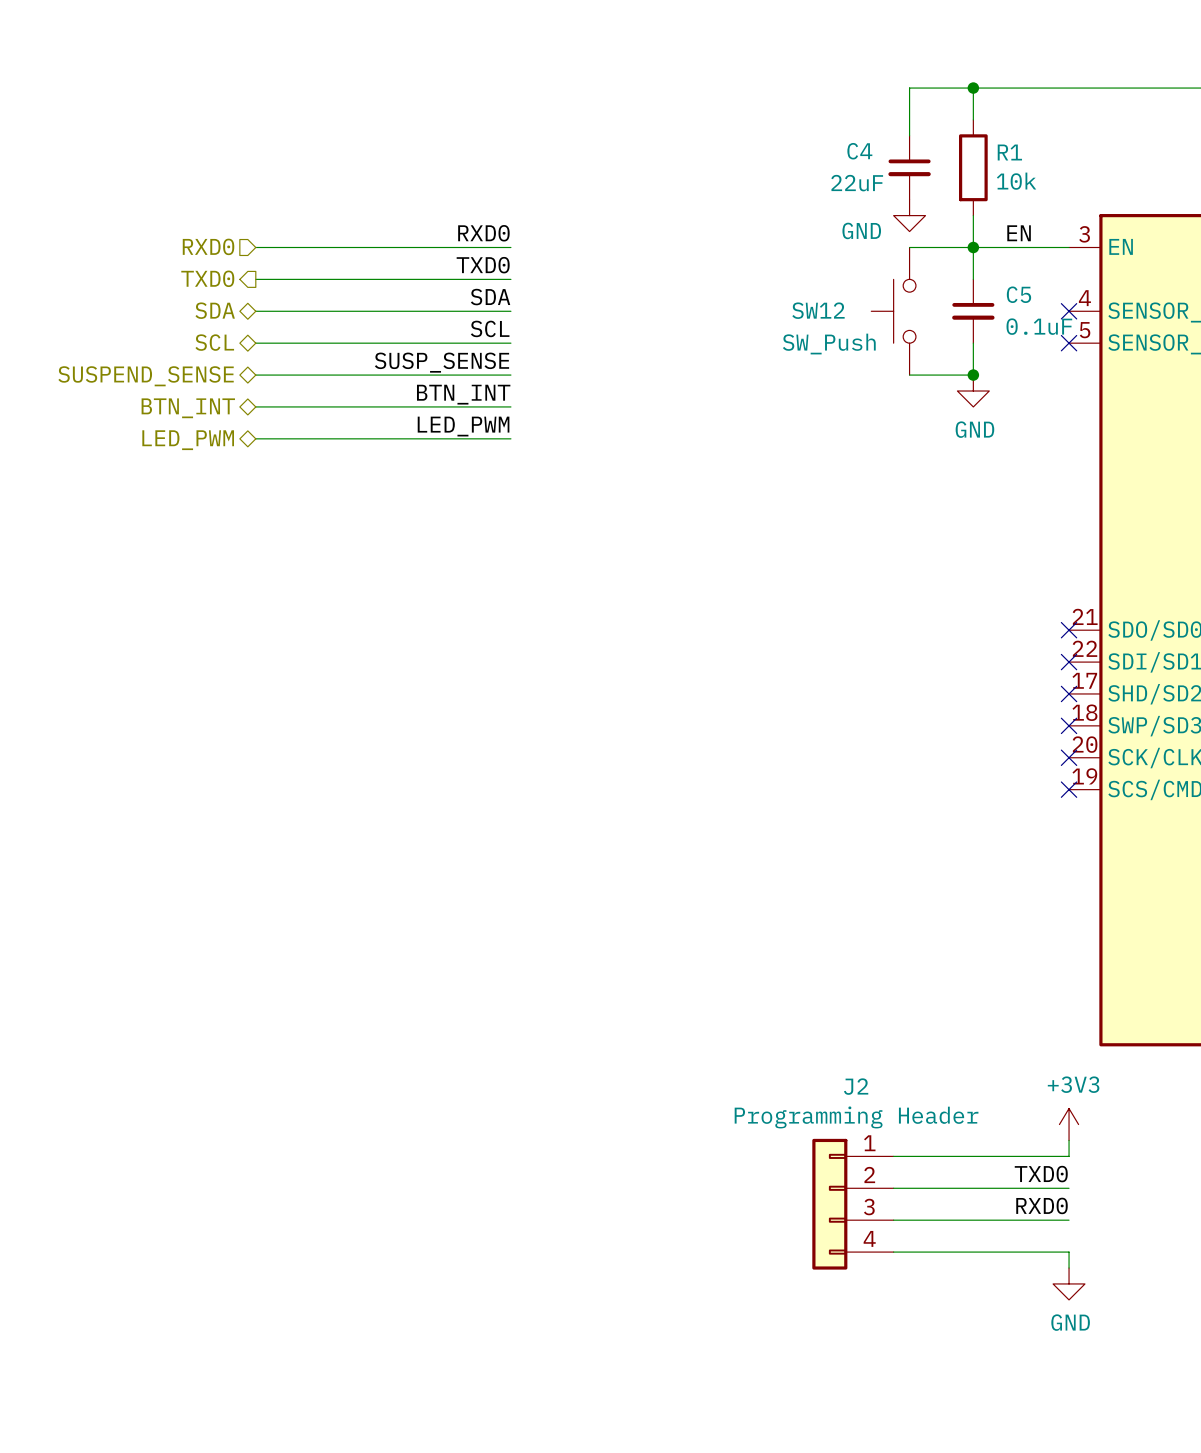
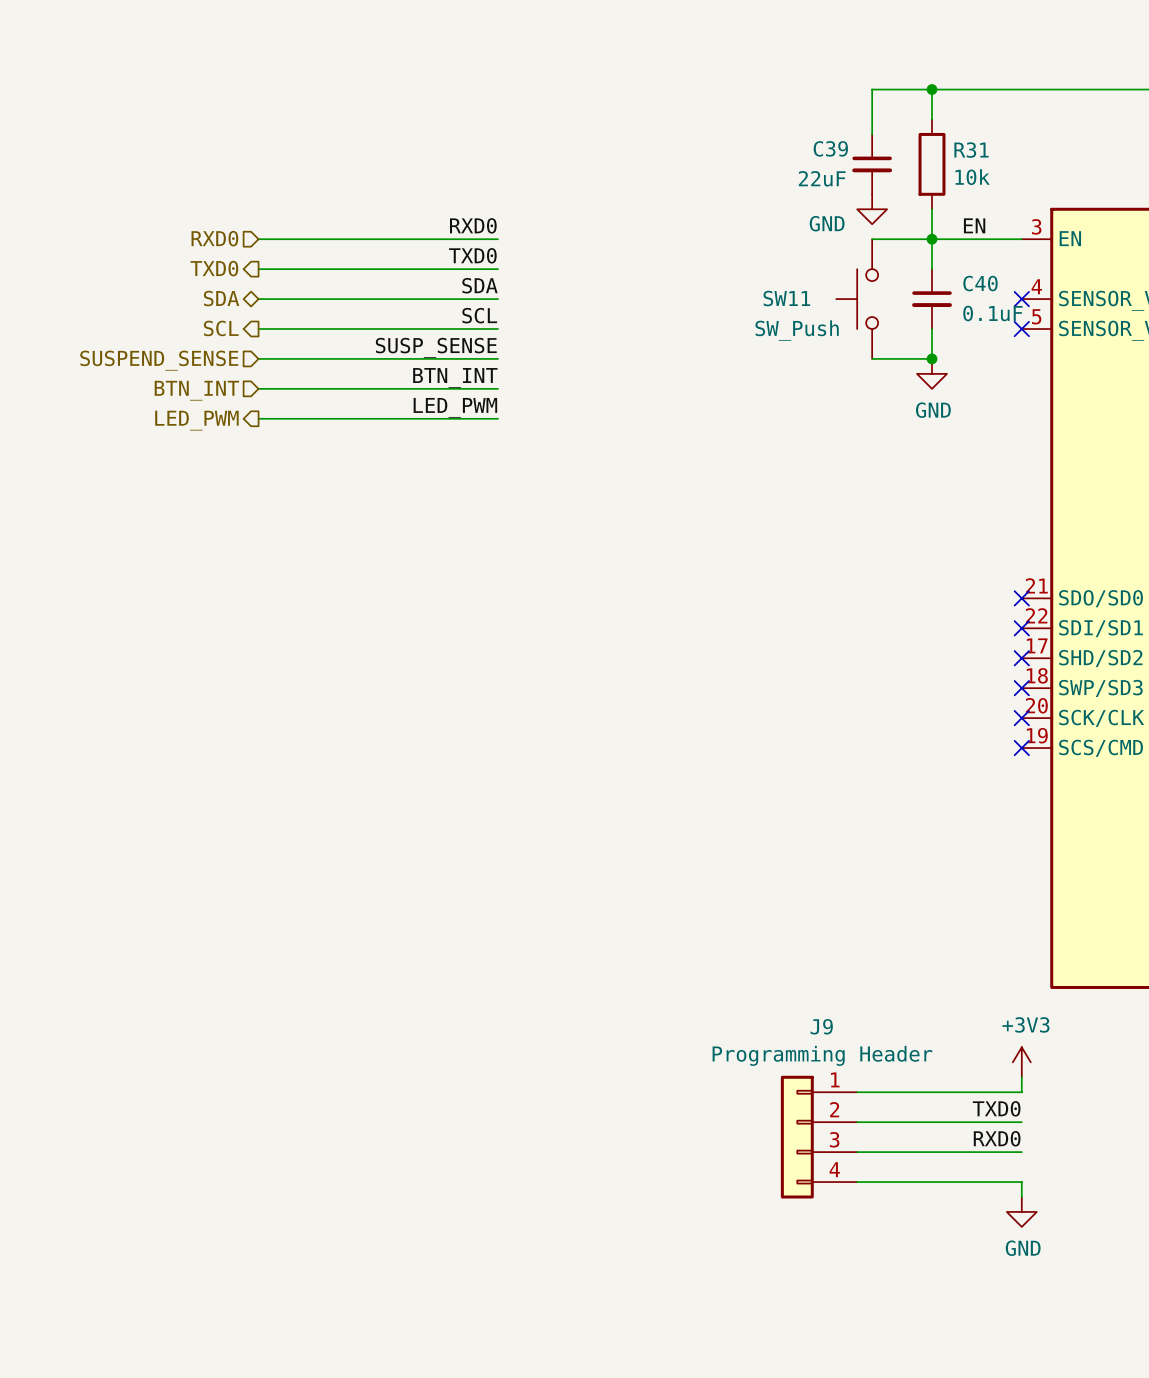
C4 name: C4 (859, 151) -> C39 (830, 148)
R1 name: R1 (1009, 152) -> R31 (971, 150)
C5 name: C5 (1018, 294) -> C40 (980, 283)
SW12 name: SW12 (818, 310) -> SW11 (786, 298)
hierarchical label shape: bidirectional (214, 342) -> output (221, 328)
hierarchical label shape: bidirectional (146, 376) -> input (159, 360)
hierarchical label shape: bidirectional (188, 408) -> input (196, 390)
hierarchical label shape: bidirectional (188, 440) -> output (196, 420)
J2 name: J2 (856, 1086) -> J9 (821, 1026)

